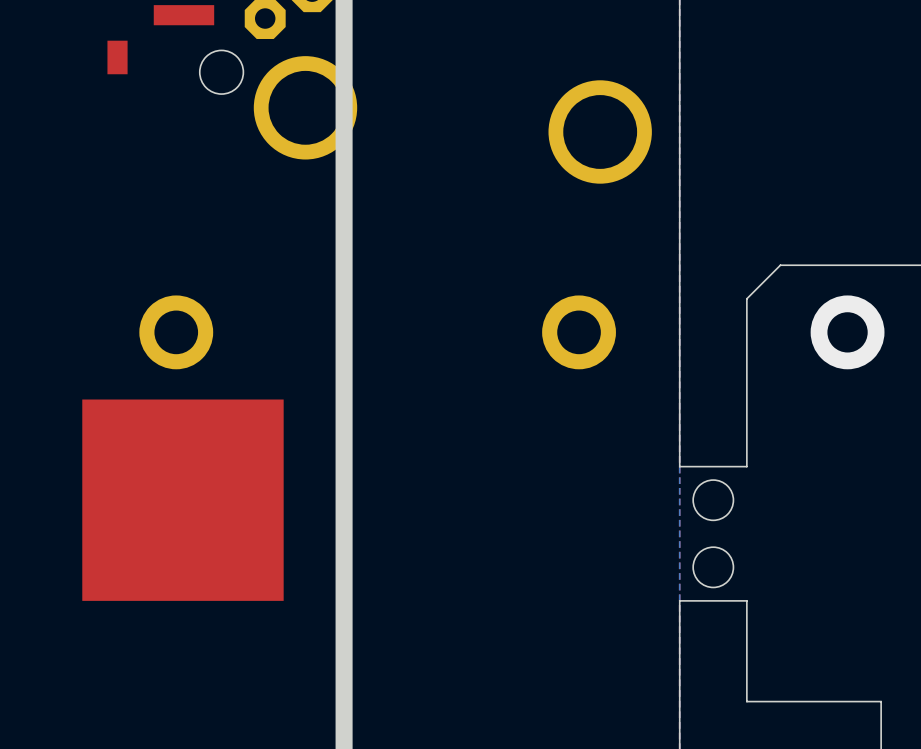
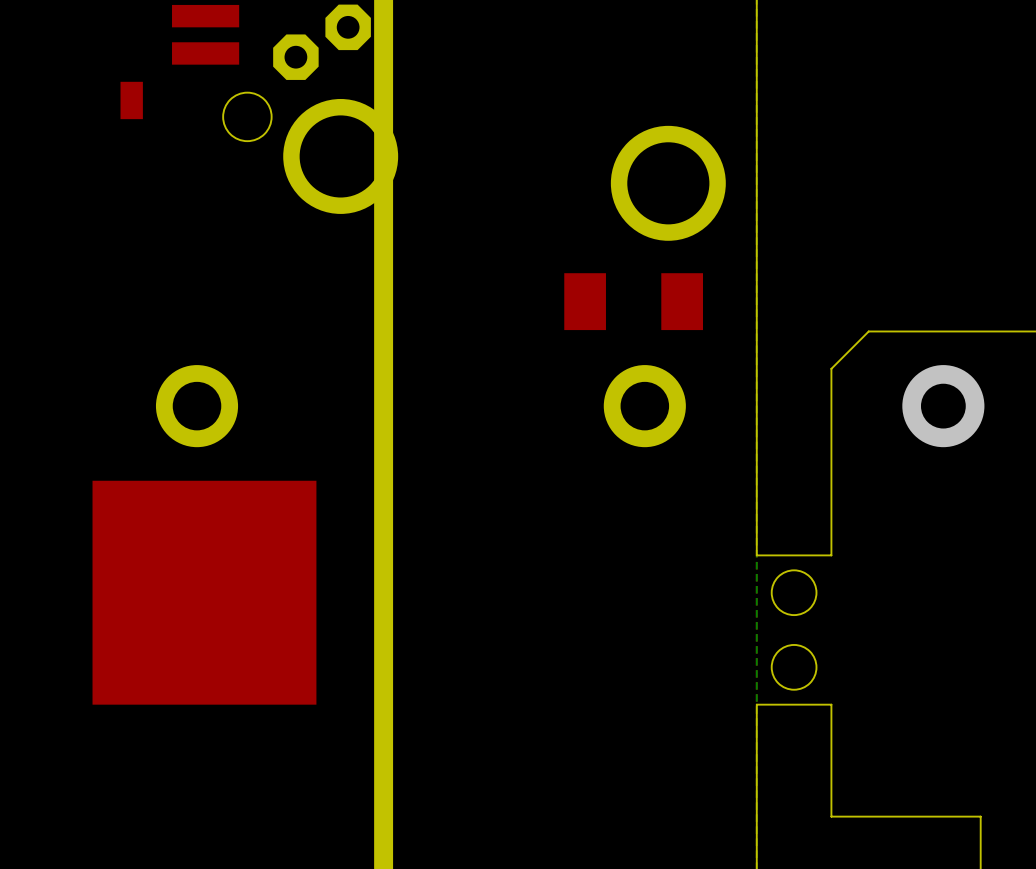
part: none -> (633, 301)

